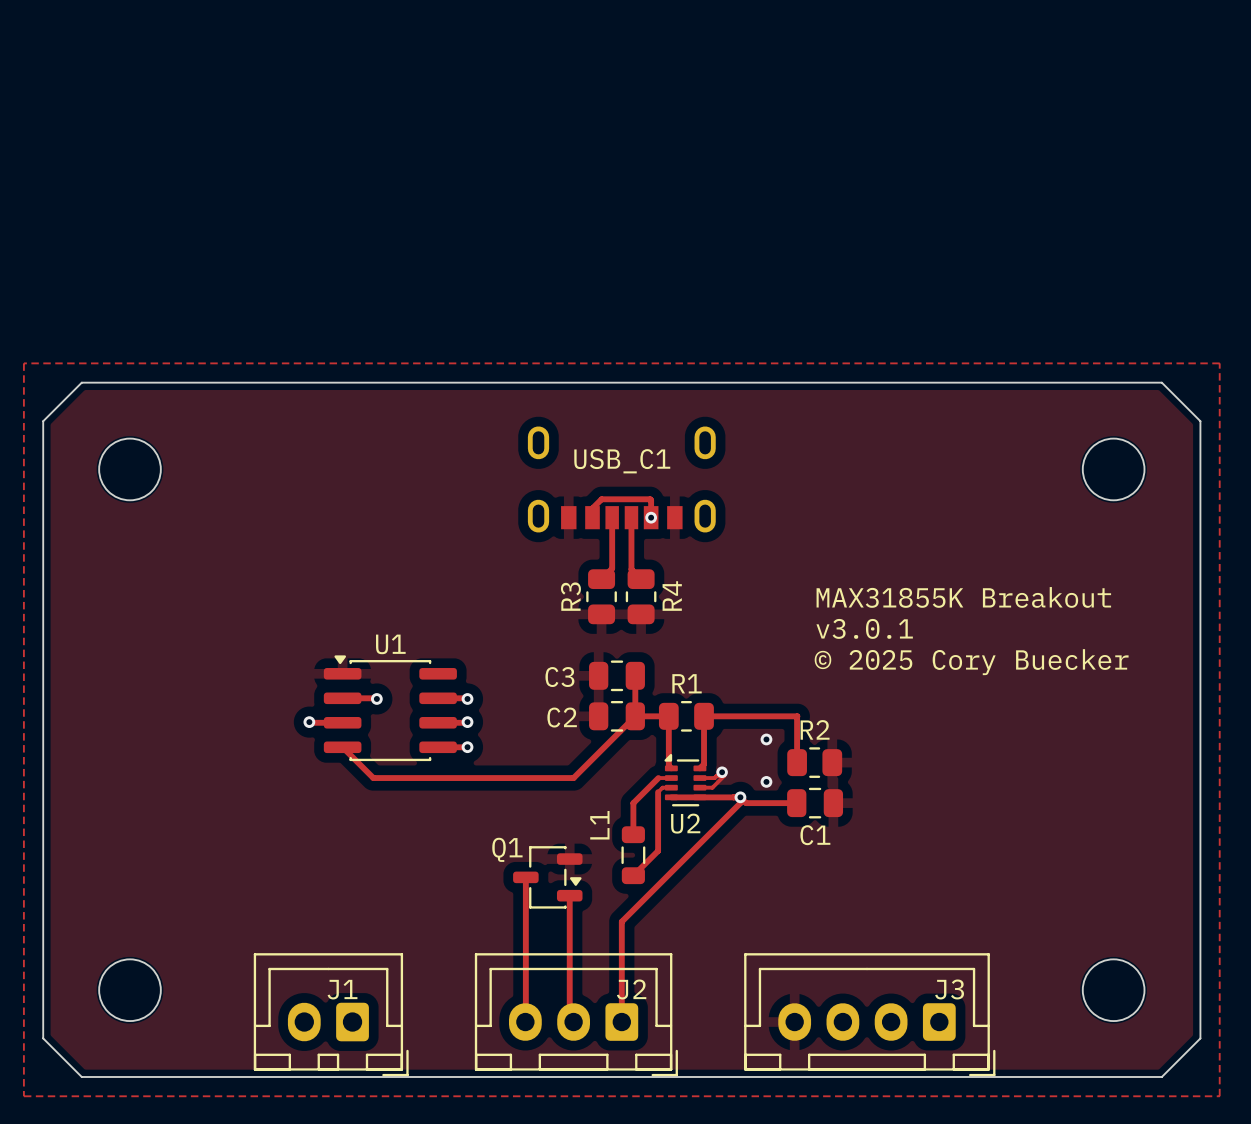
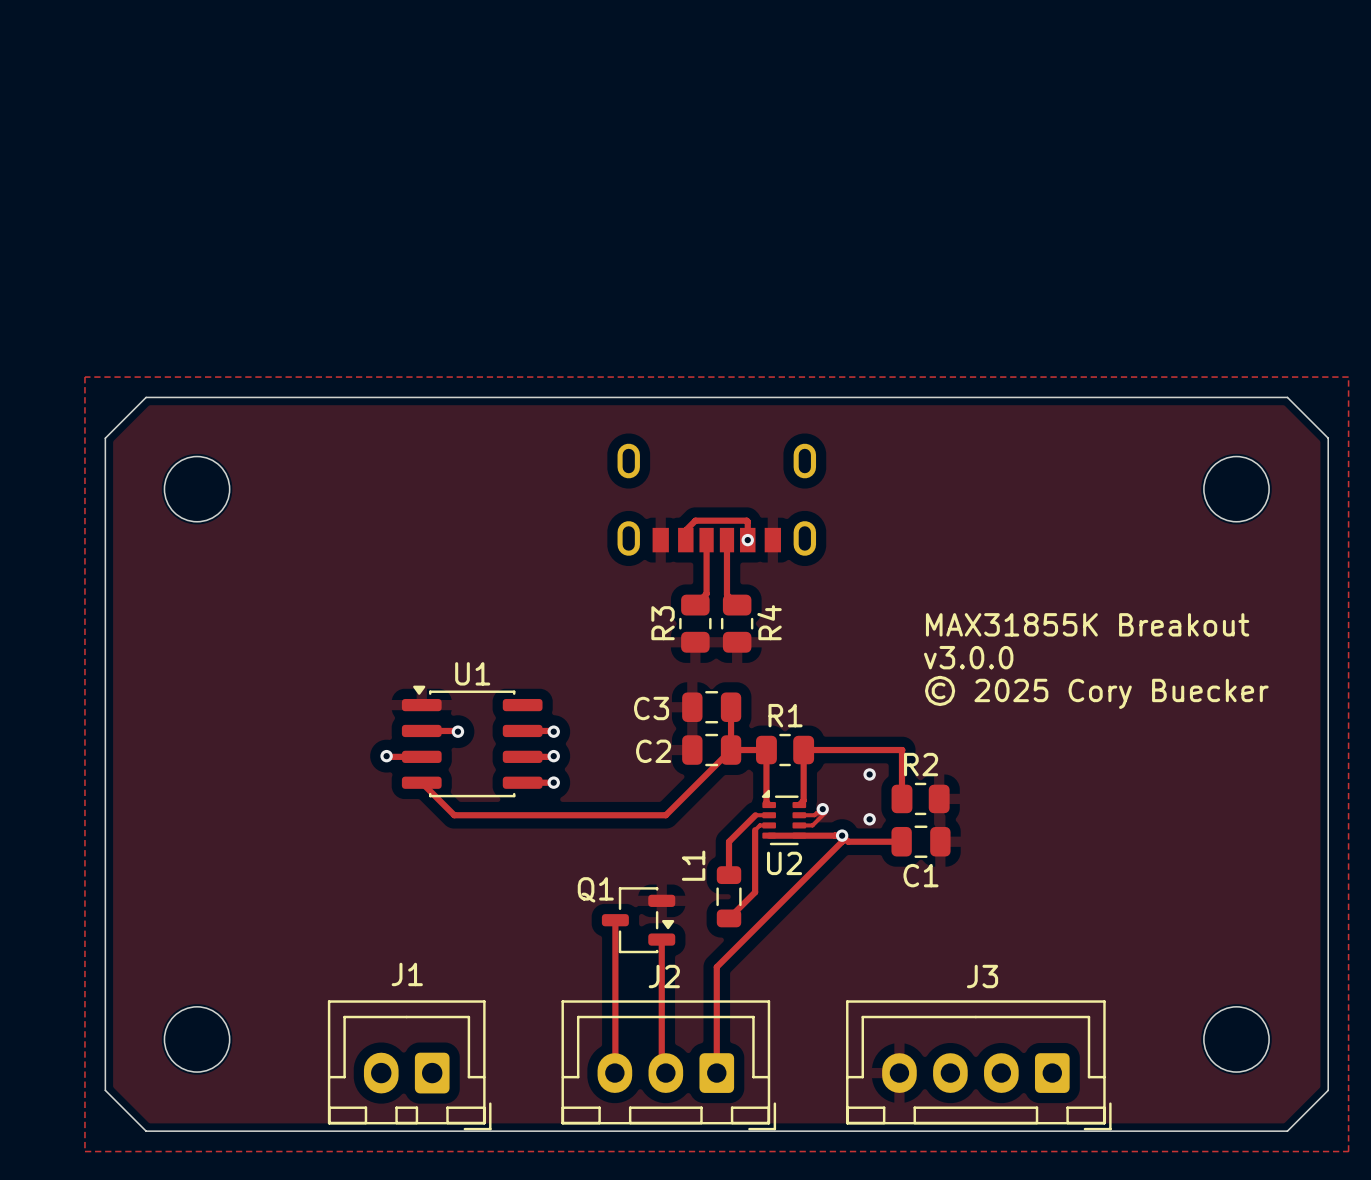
USB_C1 name: USB_C1 (622, 461) -> none
text: v3.0.1 (864, 628) -> v3.0.0 (968, 657)
J1 name position: J1 (342, 989) -> J1 (407, 974)
J2 name position: J2 (631, 989) -> J2 (664, 976)
J3 name position: J3 (949, 989) -> J3 (982, 976)

